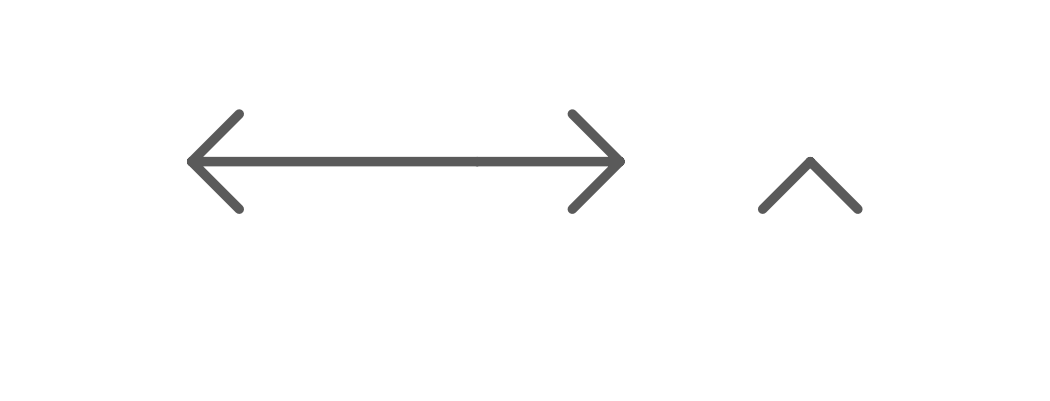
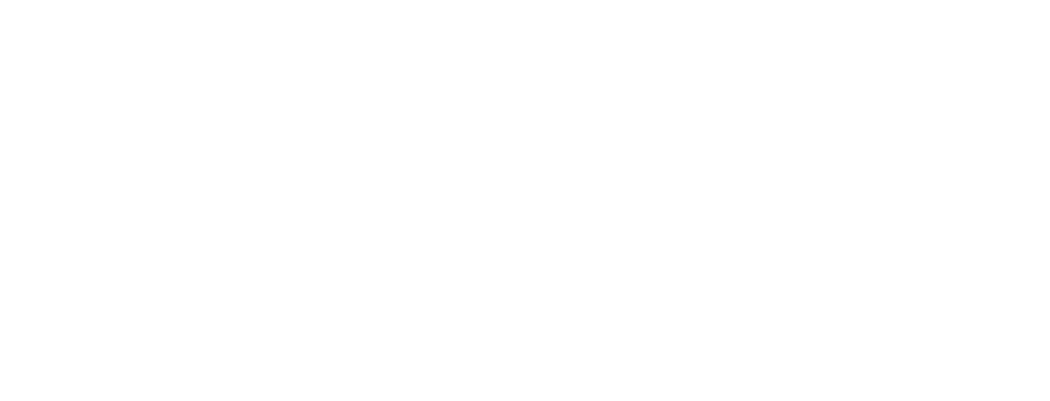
line: (239, 114) (191, 161) -> none
line: (572, 114) (619, 161) -> none
line: (191, 161) (619, 161) -> none
line: (191, 161) (239, 209) -> none
line: (619, 161) (572, 209) -> none
line: (762, 209) (810, 161) (857, 209) -> none

